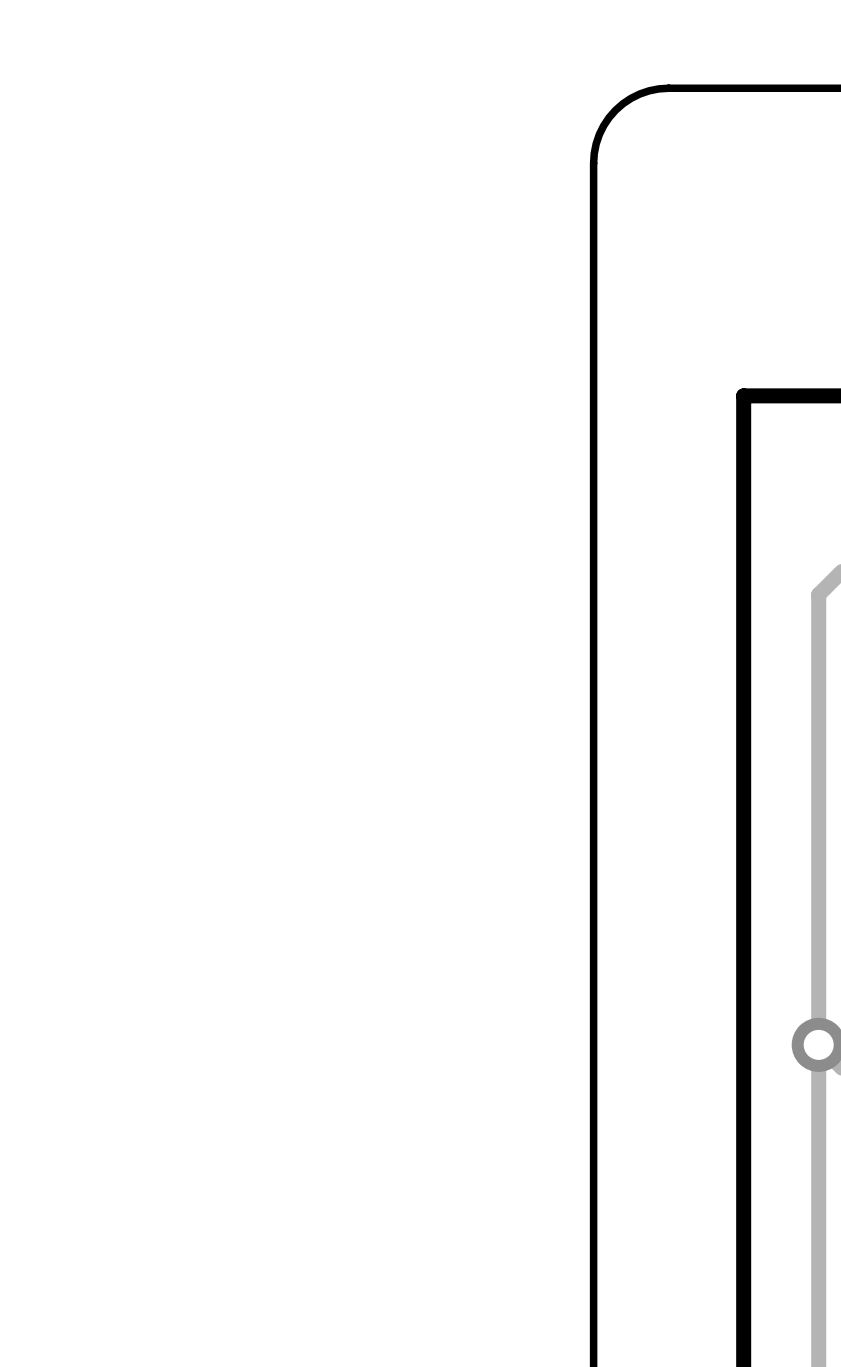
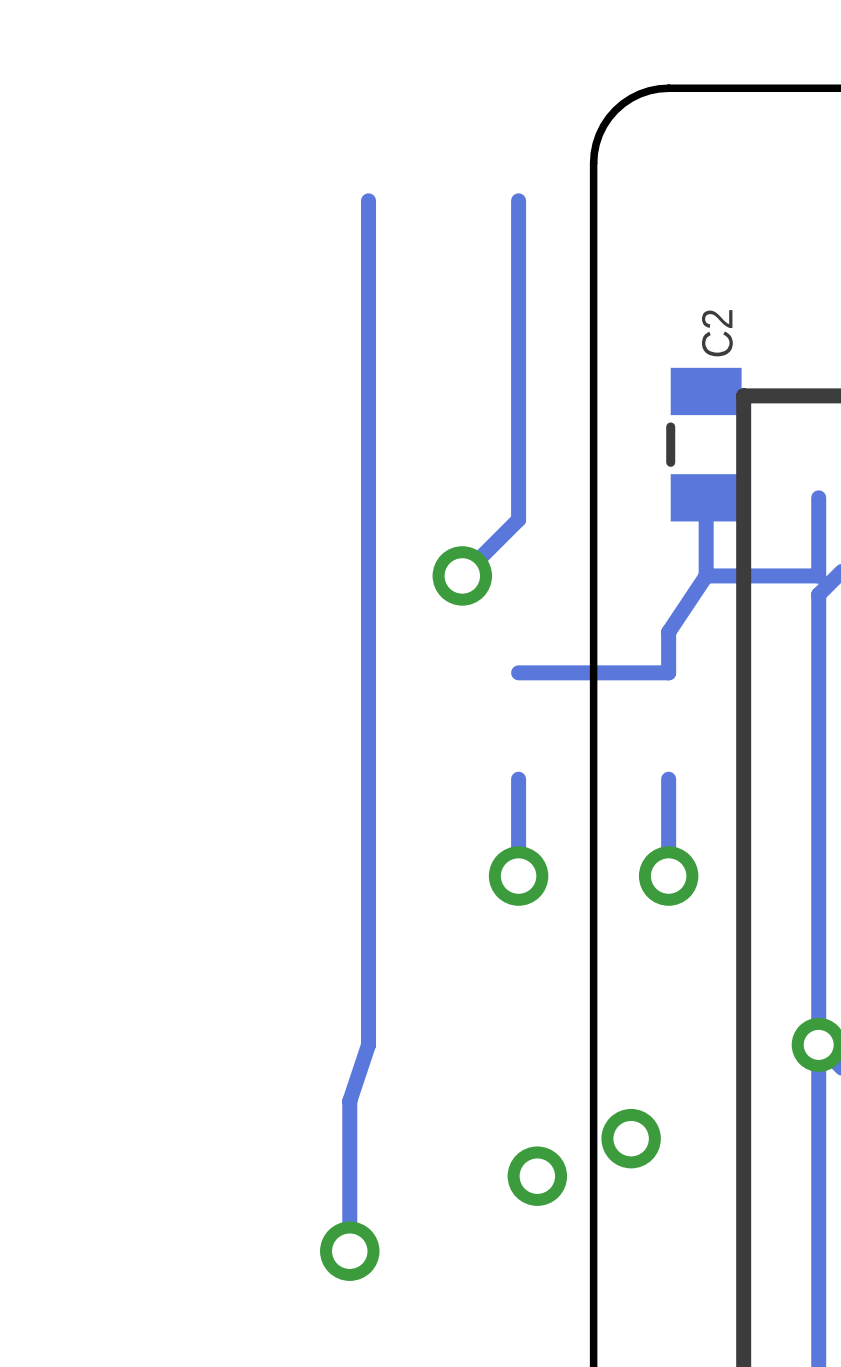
track: none -> (368, 200) (368, 1044) (349, 1101) (349, 1251)
track: none -> (518, 200) (518, 519) (462, 575)
C2: none -> (706, 444)
track: none -> (706, 497) (706, 575)
track: none -> (818, 497) (818, 575) (706, 575)
via: none -> (462, 575)
track: none -> (706, 575) (668, 632) (668, 672) (518, 672)
track: none -> (518, 779) (518, 876)
track: none -> (668, 779) (668, 876)
via: none -> (518, 876)
via: none -> (668, 876)
via: none -> (631, 1138)
via: none -> (537, 1176)
via: none -> (349, 1251)

